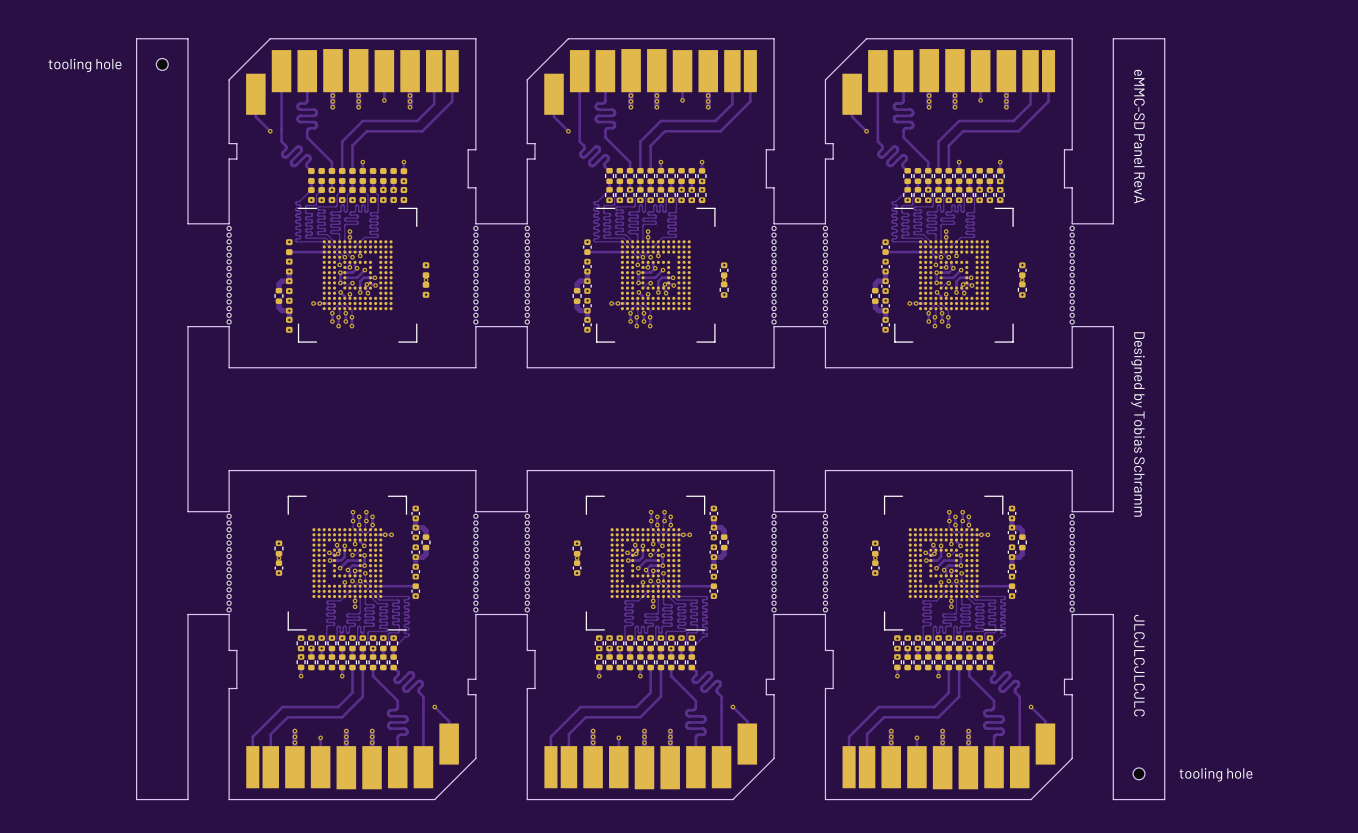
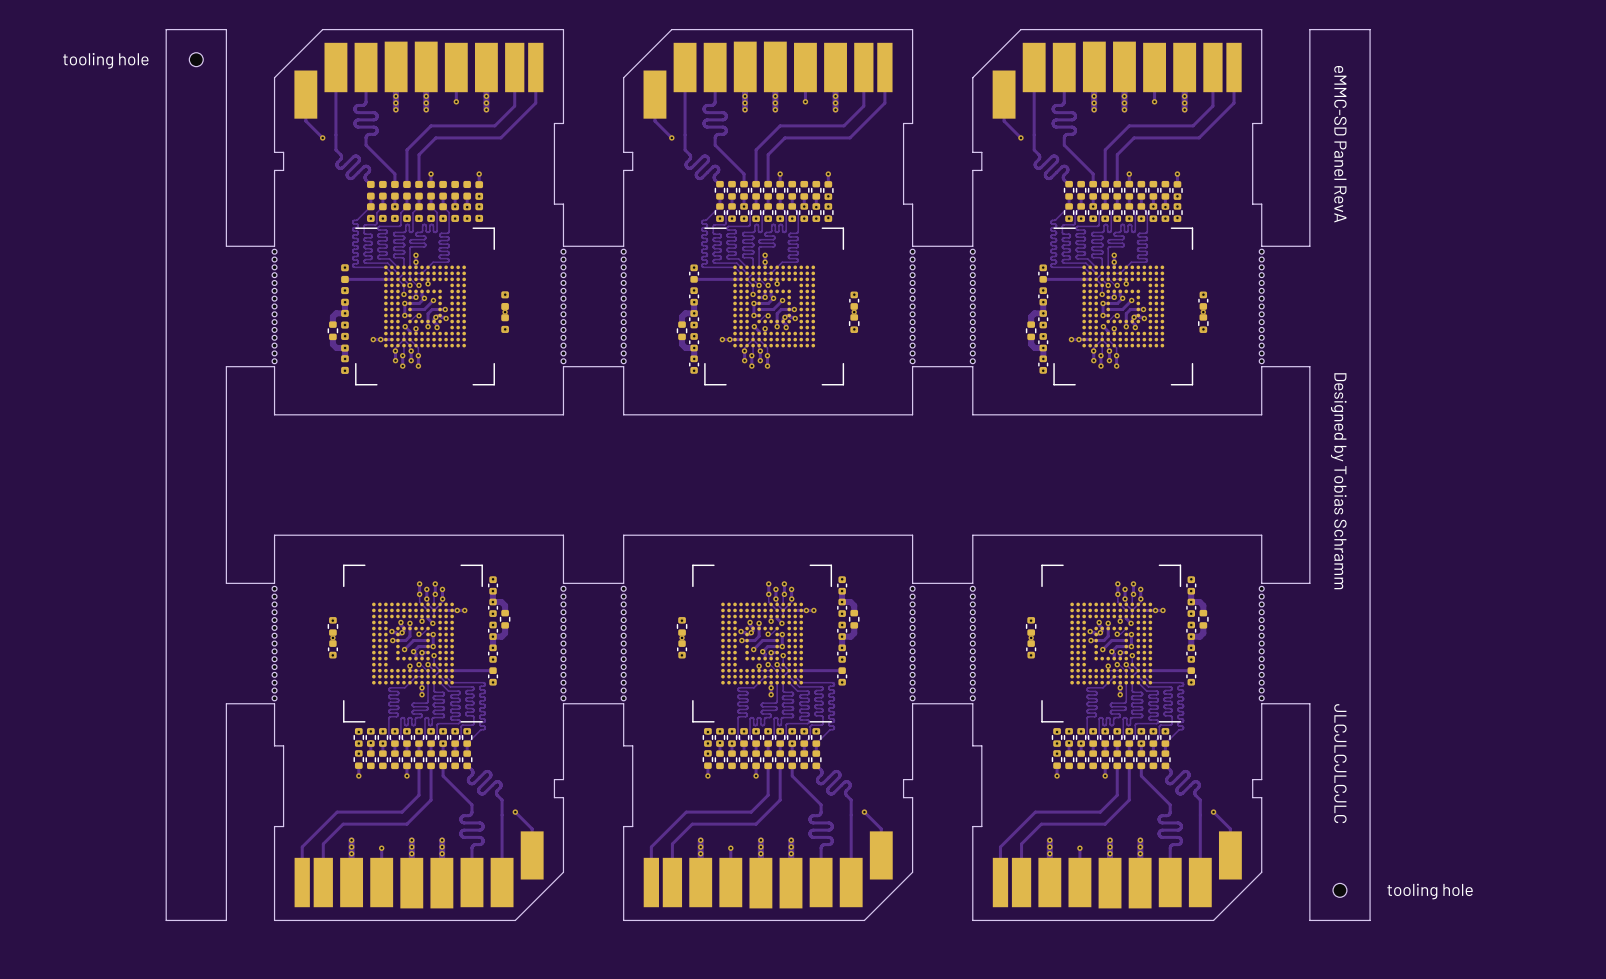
part footprint: [228, 38, 477, 189] -> [274, 29, 564, 205]
part footprint: [527, 38, 775, 189] -> [623, 29, 913, 205]
part footprint: [825, 38, 1073, 189] -> [972, 29, 1263, 205]
part footprint: [228, 650, 477, 800] -> [274, 745, 564, 921]
part footprint: [527, 650, 775, 800] -> [623, 745, 913, 921]
part footprint: [825, 650, 1073, 800] -> [972, 745, 1263, 921]

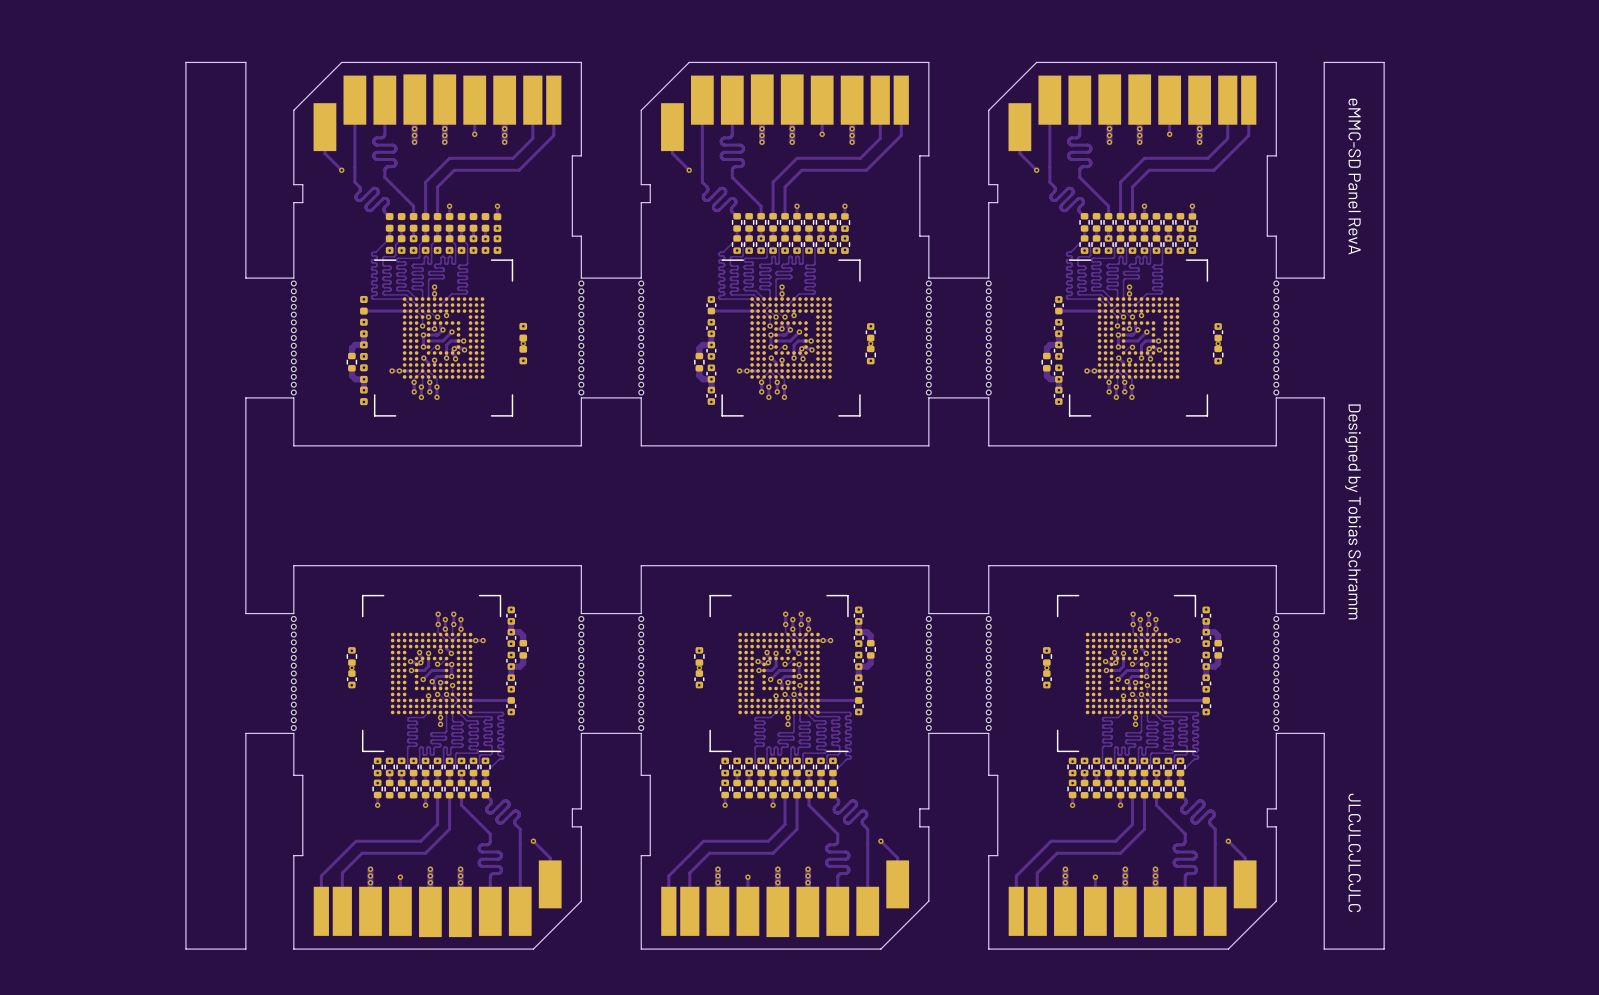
part: (196, 59) -> none
text position: JLCJLCJLCJLC (1340, 763) -> JLCJLCJLCJLC (1354, 852)
part: (1339, 890) -> none

